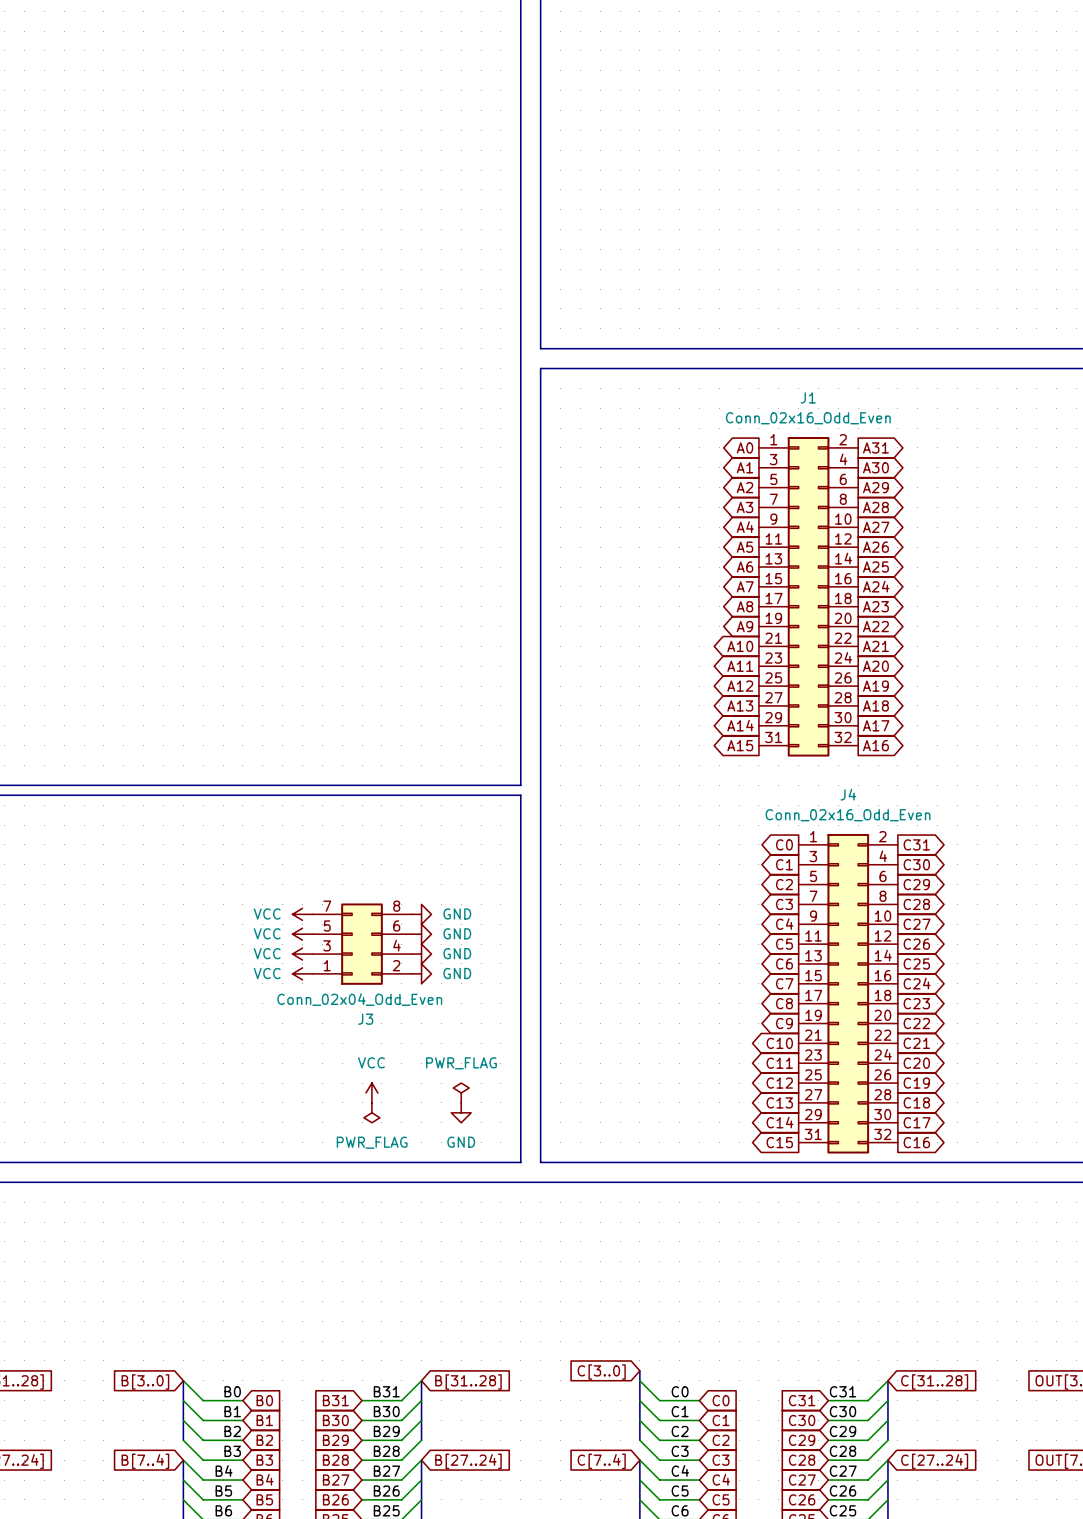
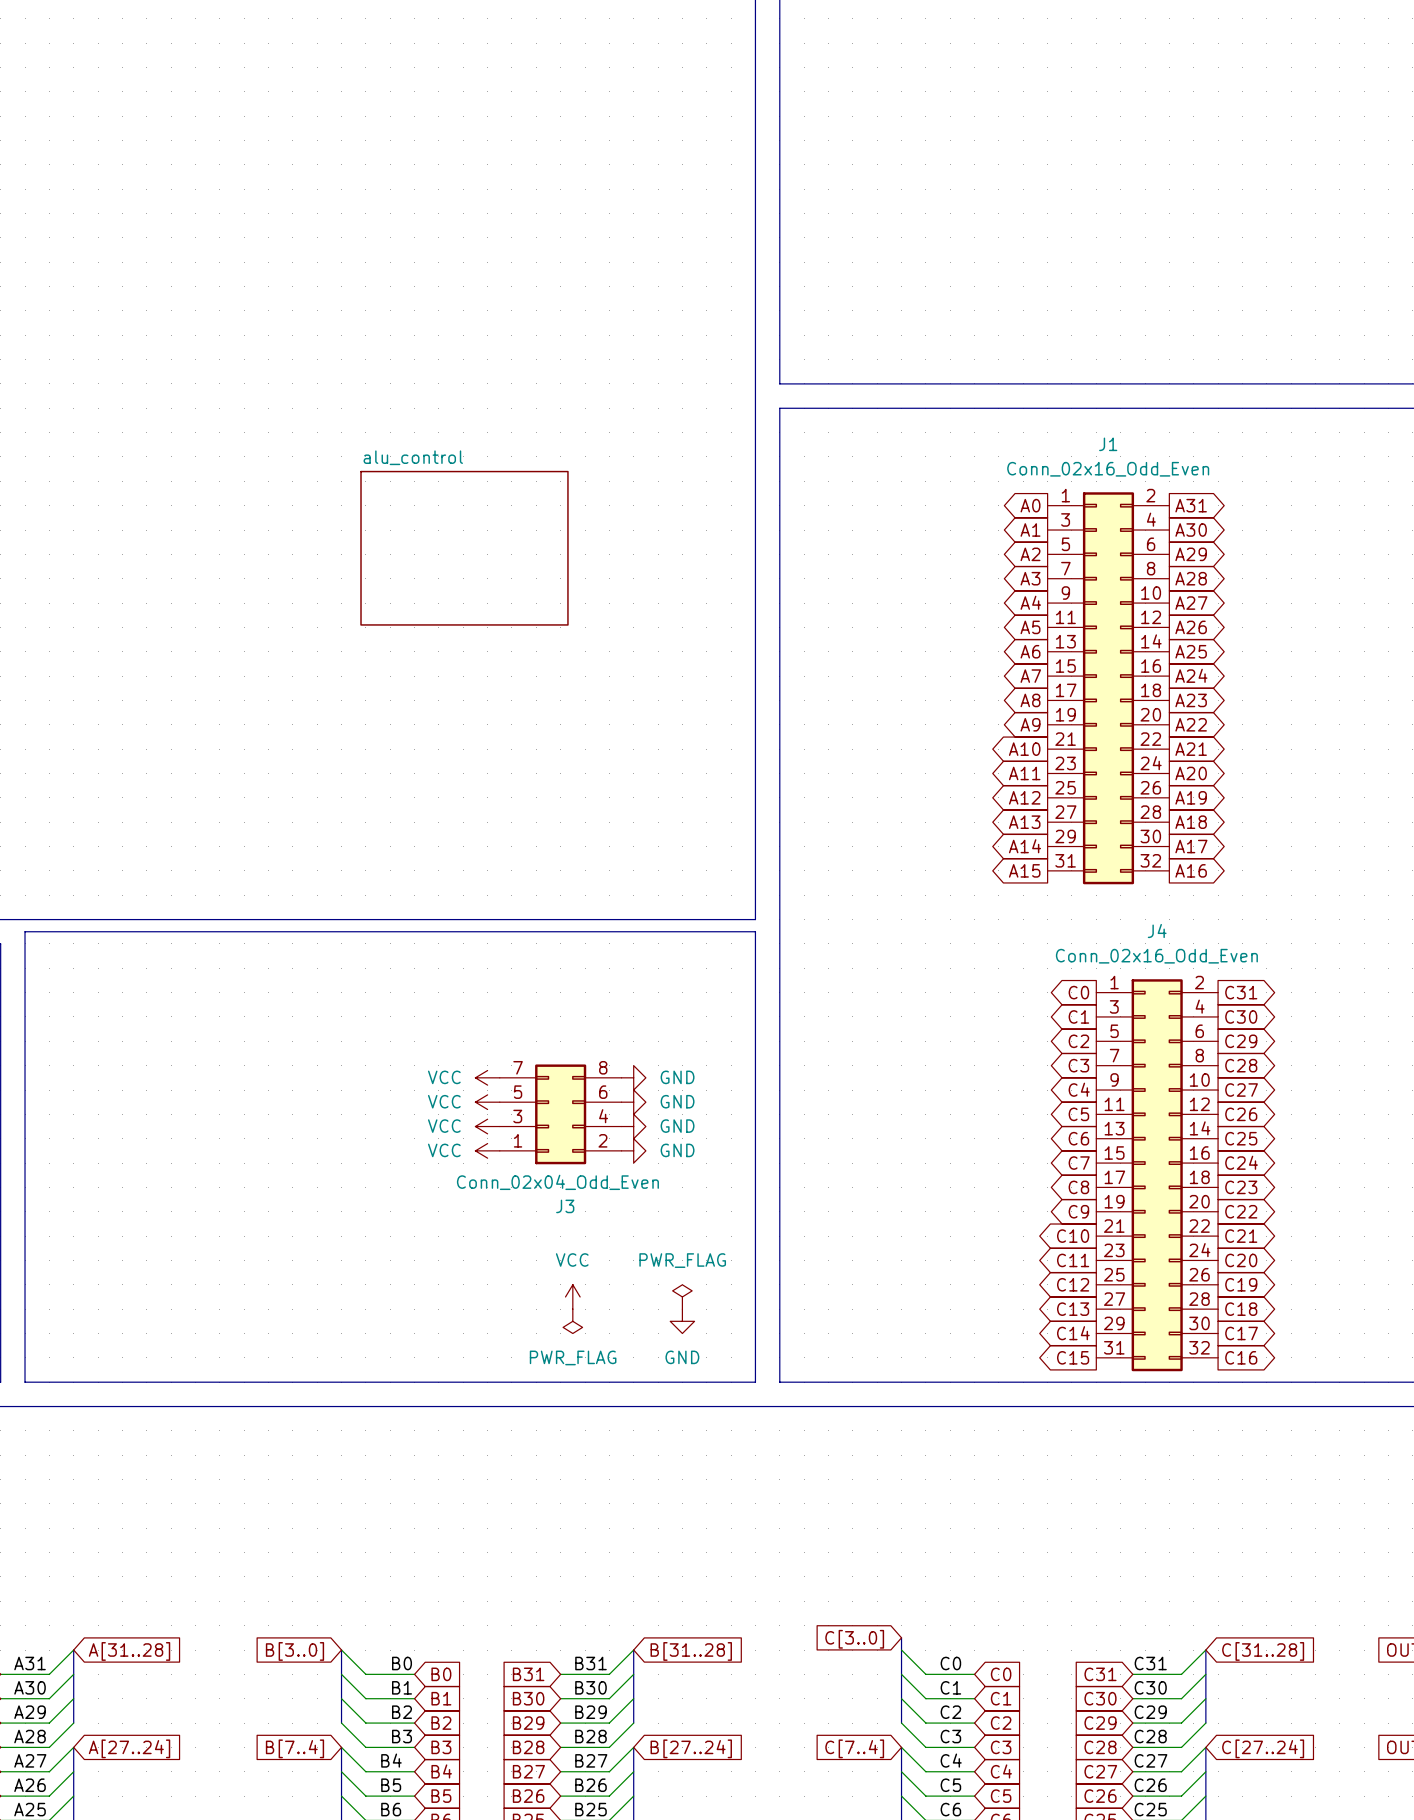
sheet alu_control: none -> (464, 548)

